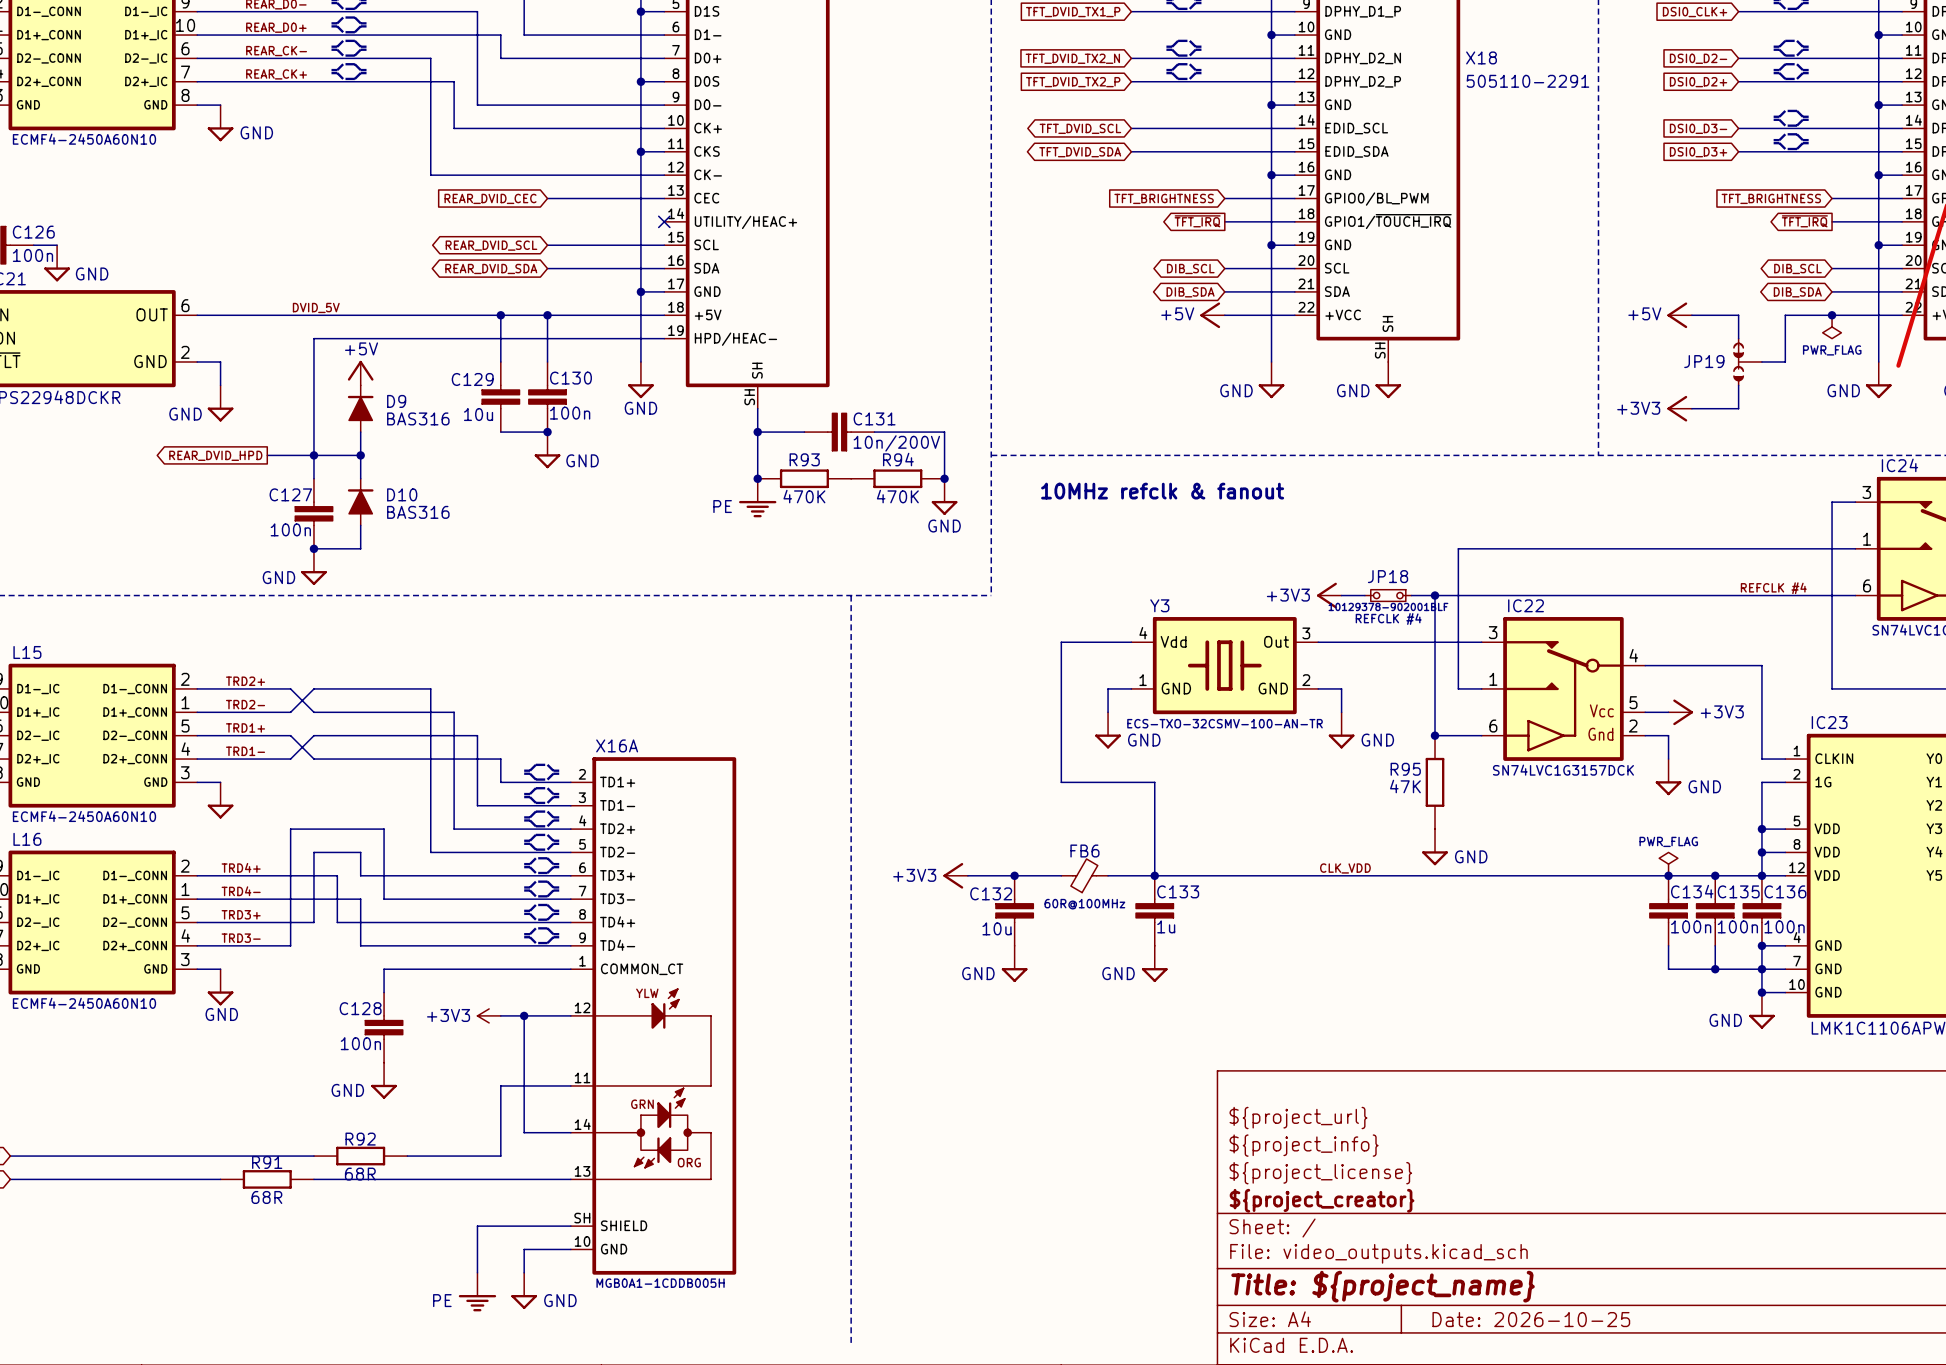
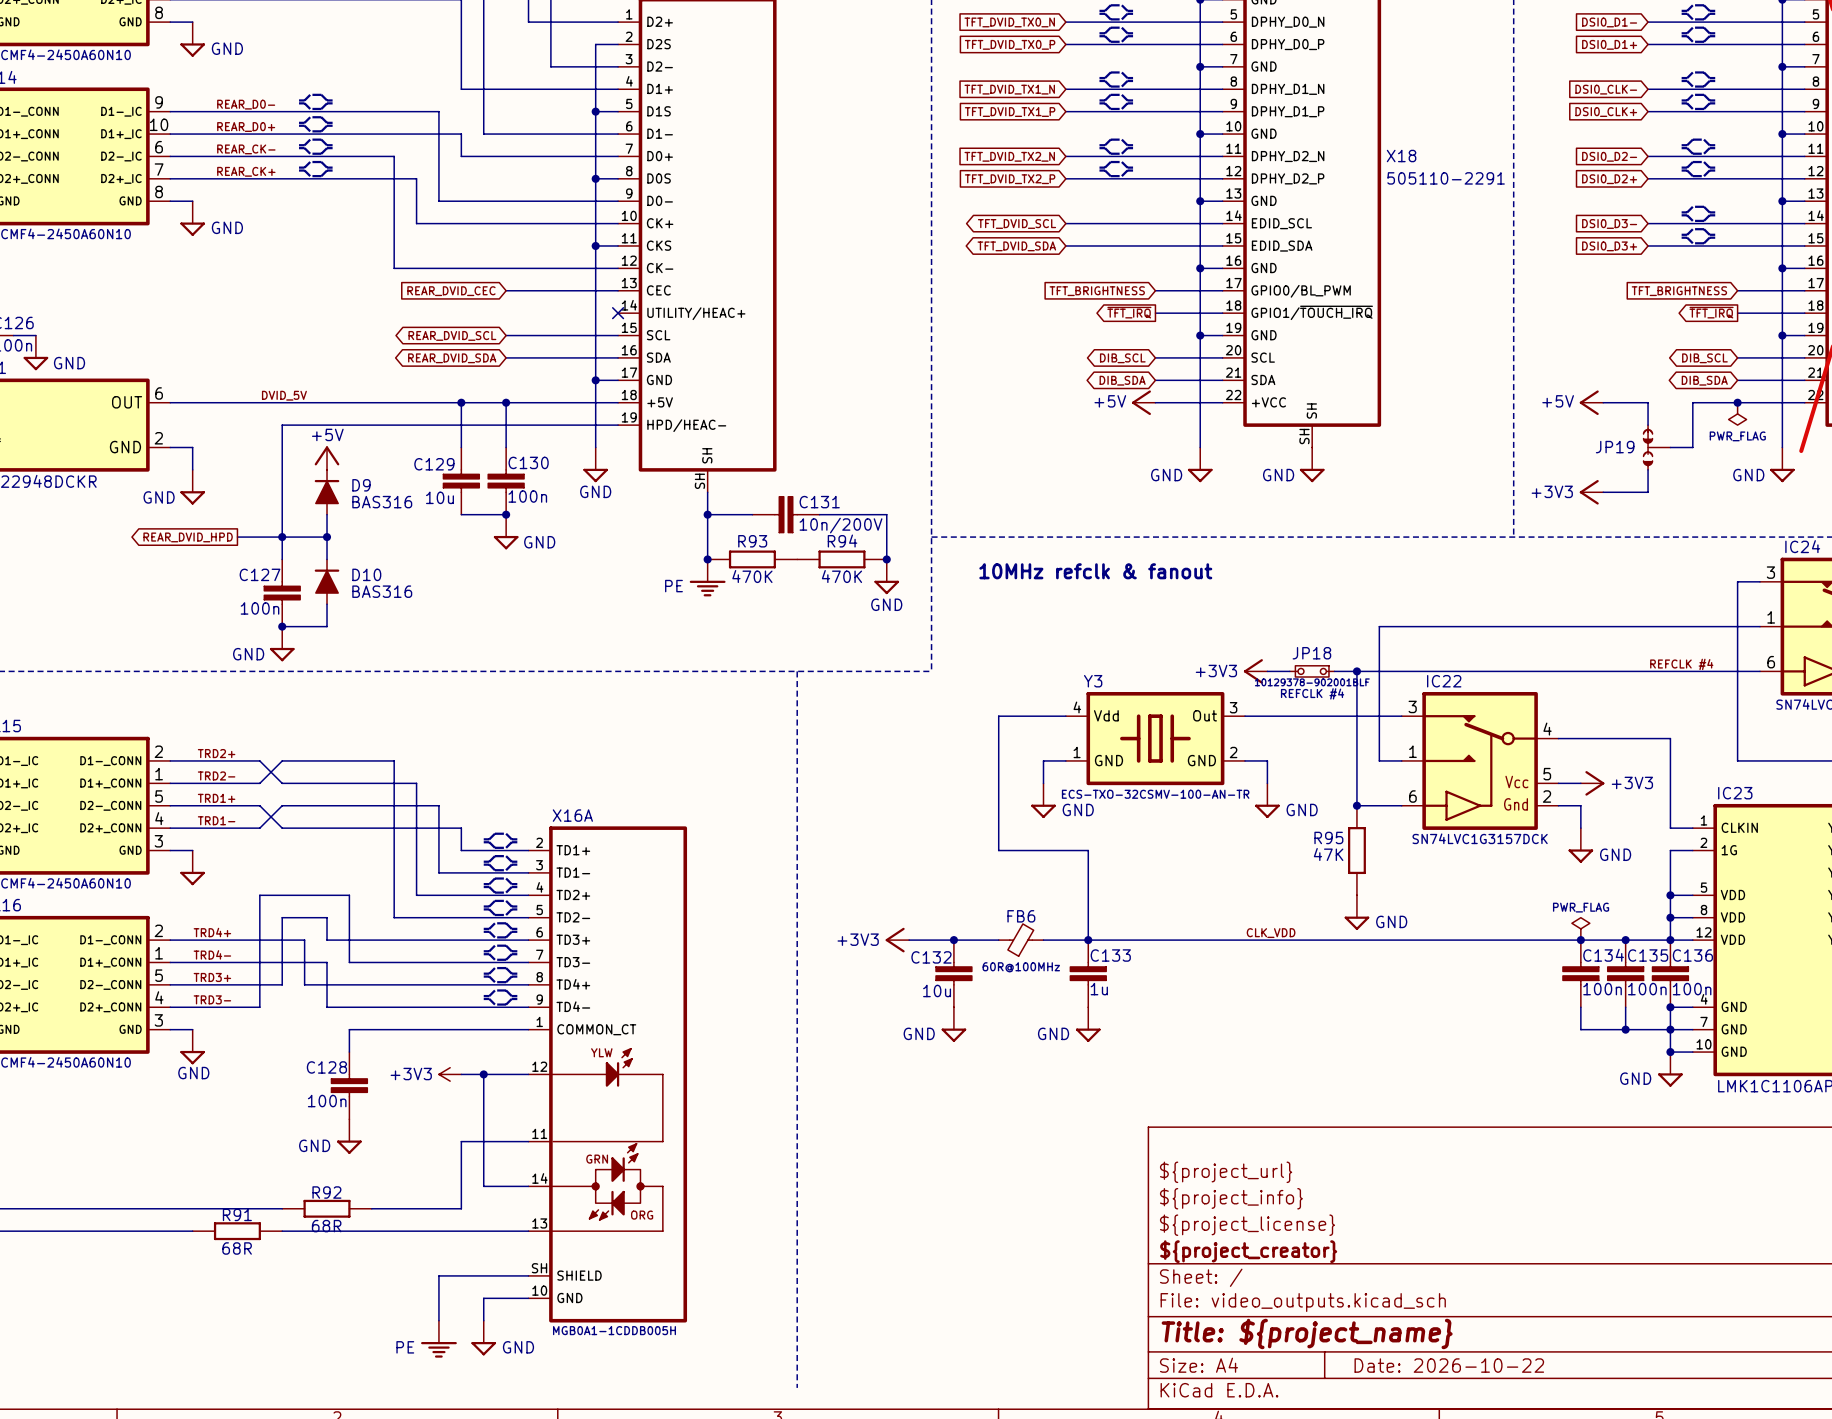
title block: Date: 2026-10-25 (1531, 1319) -> Date: 2026-10-22 (1449, 1365)

